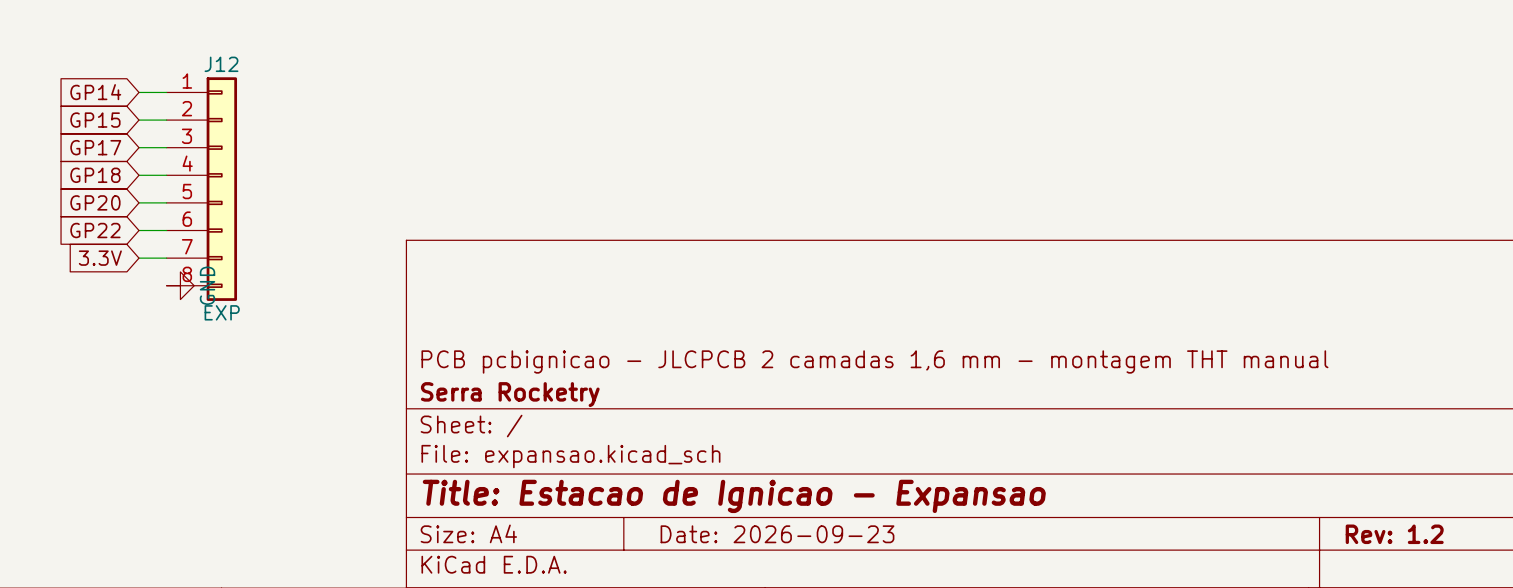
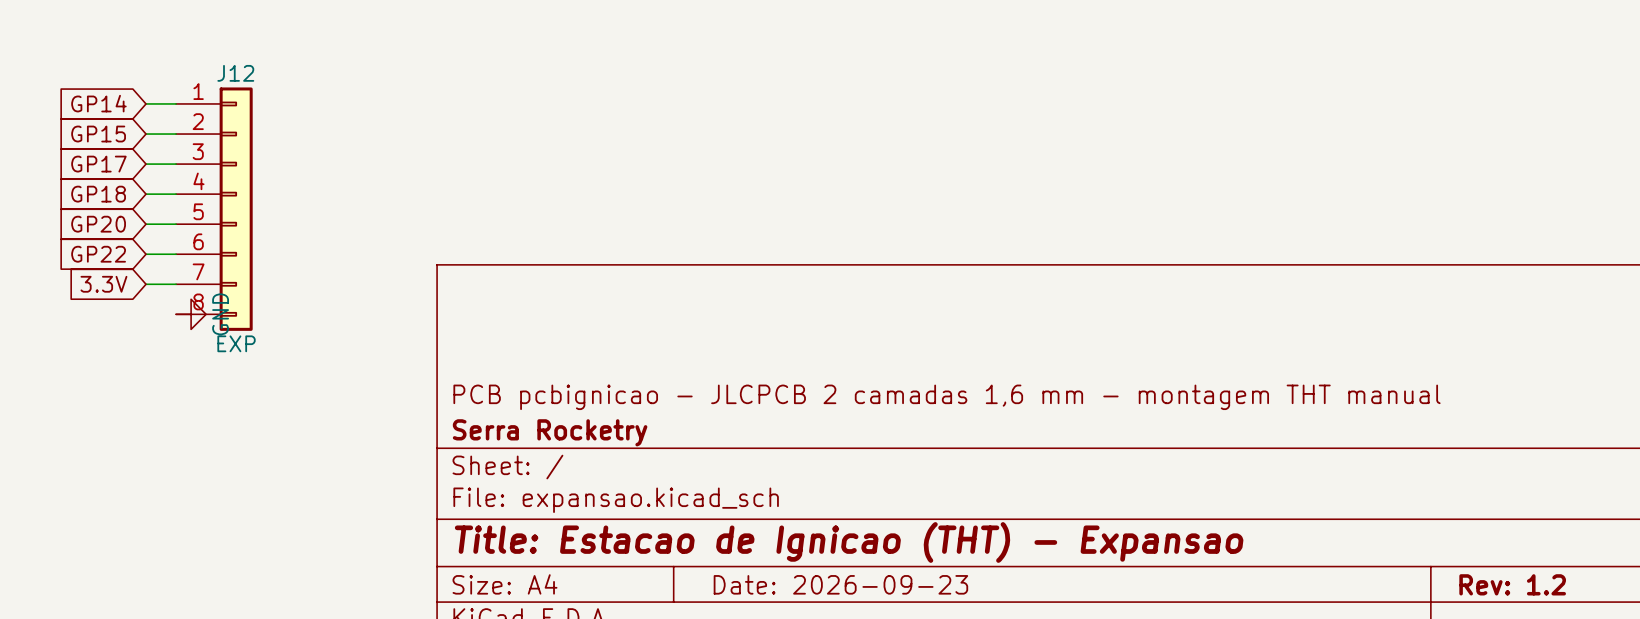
title block: Title: Estacao de Ignicao - Expansao (734, 496) -> Title: Estacao de Ignicao (THT) - Expansao (849, 542)

